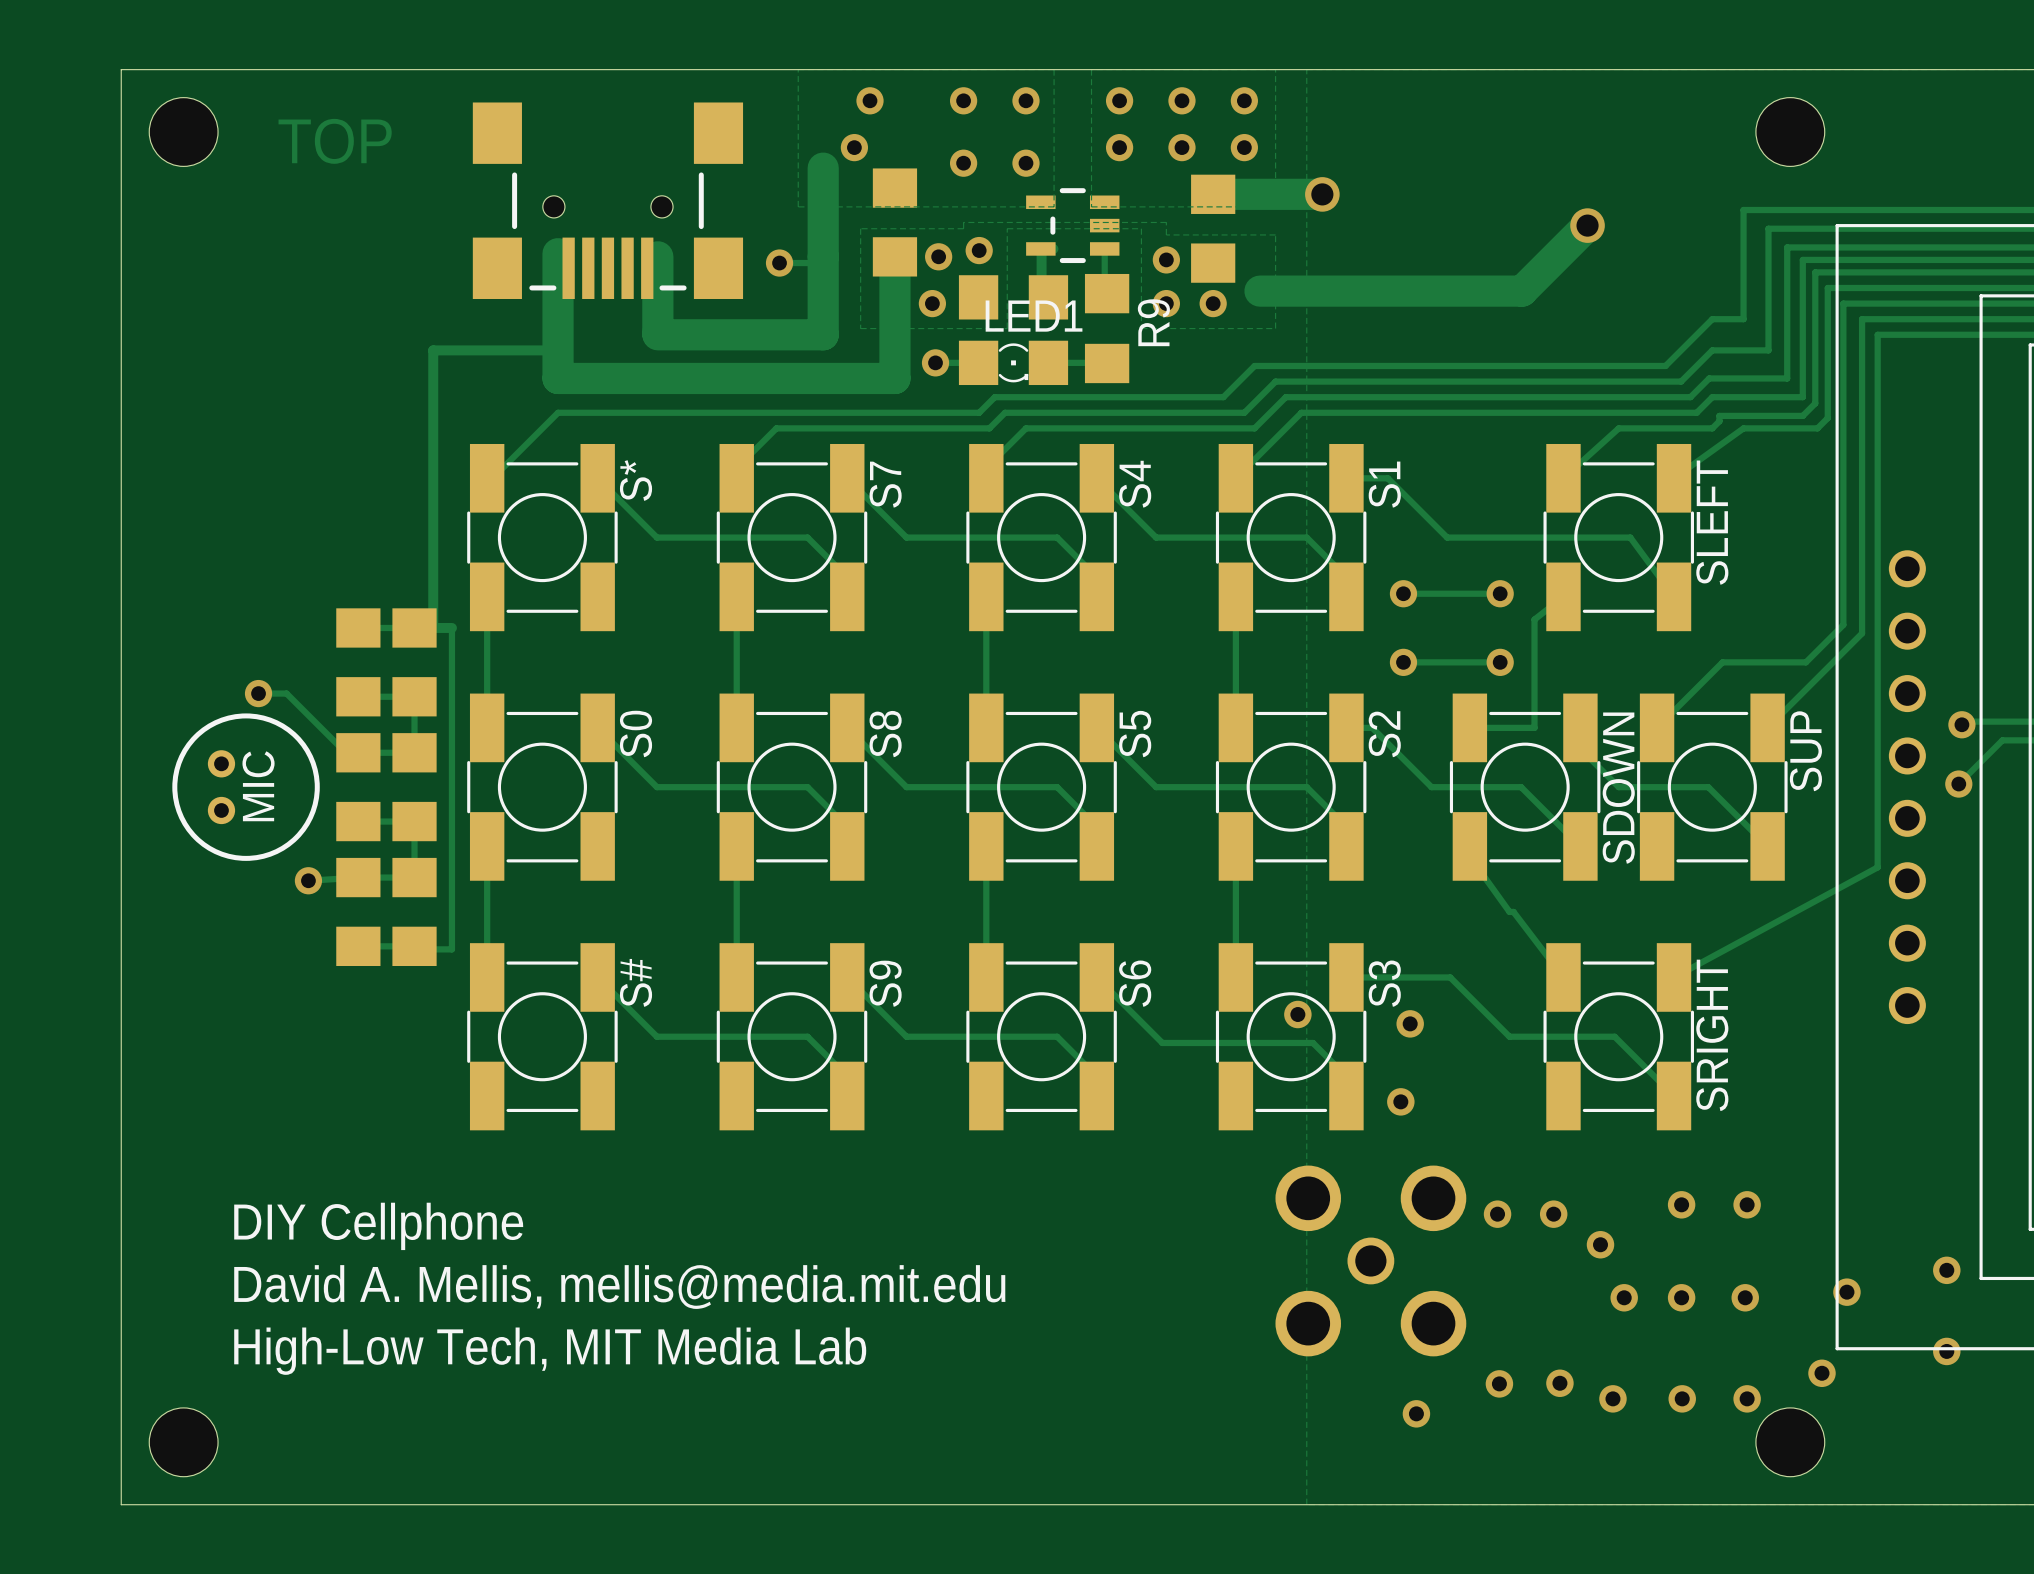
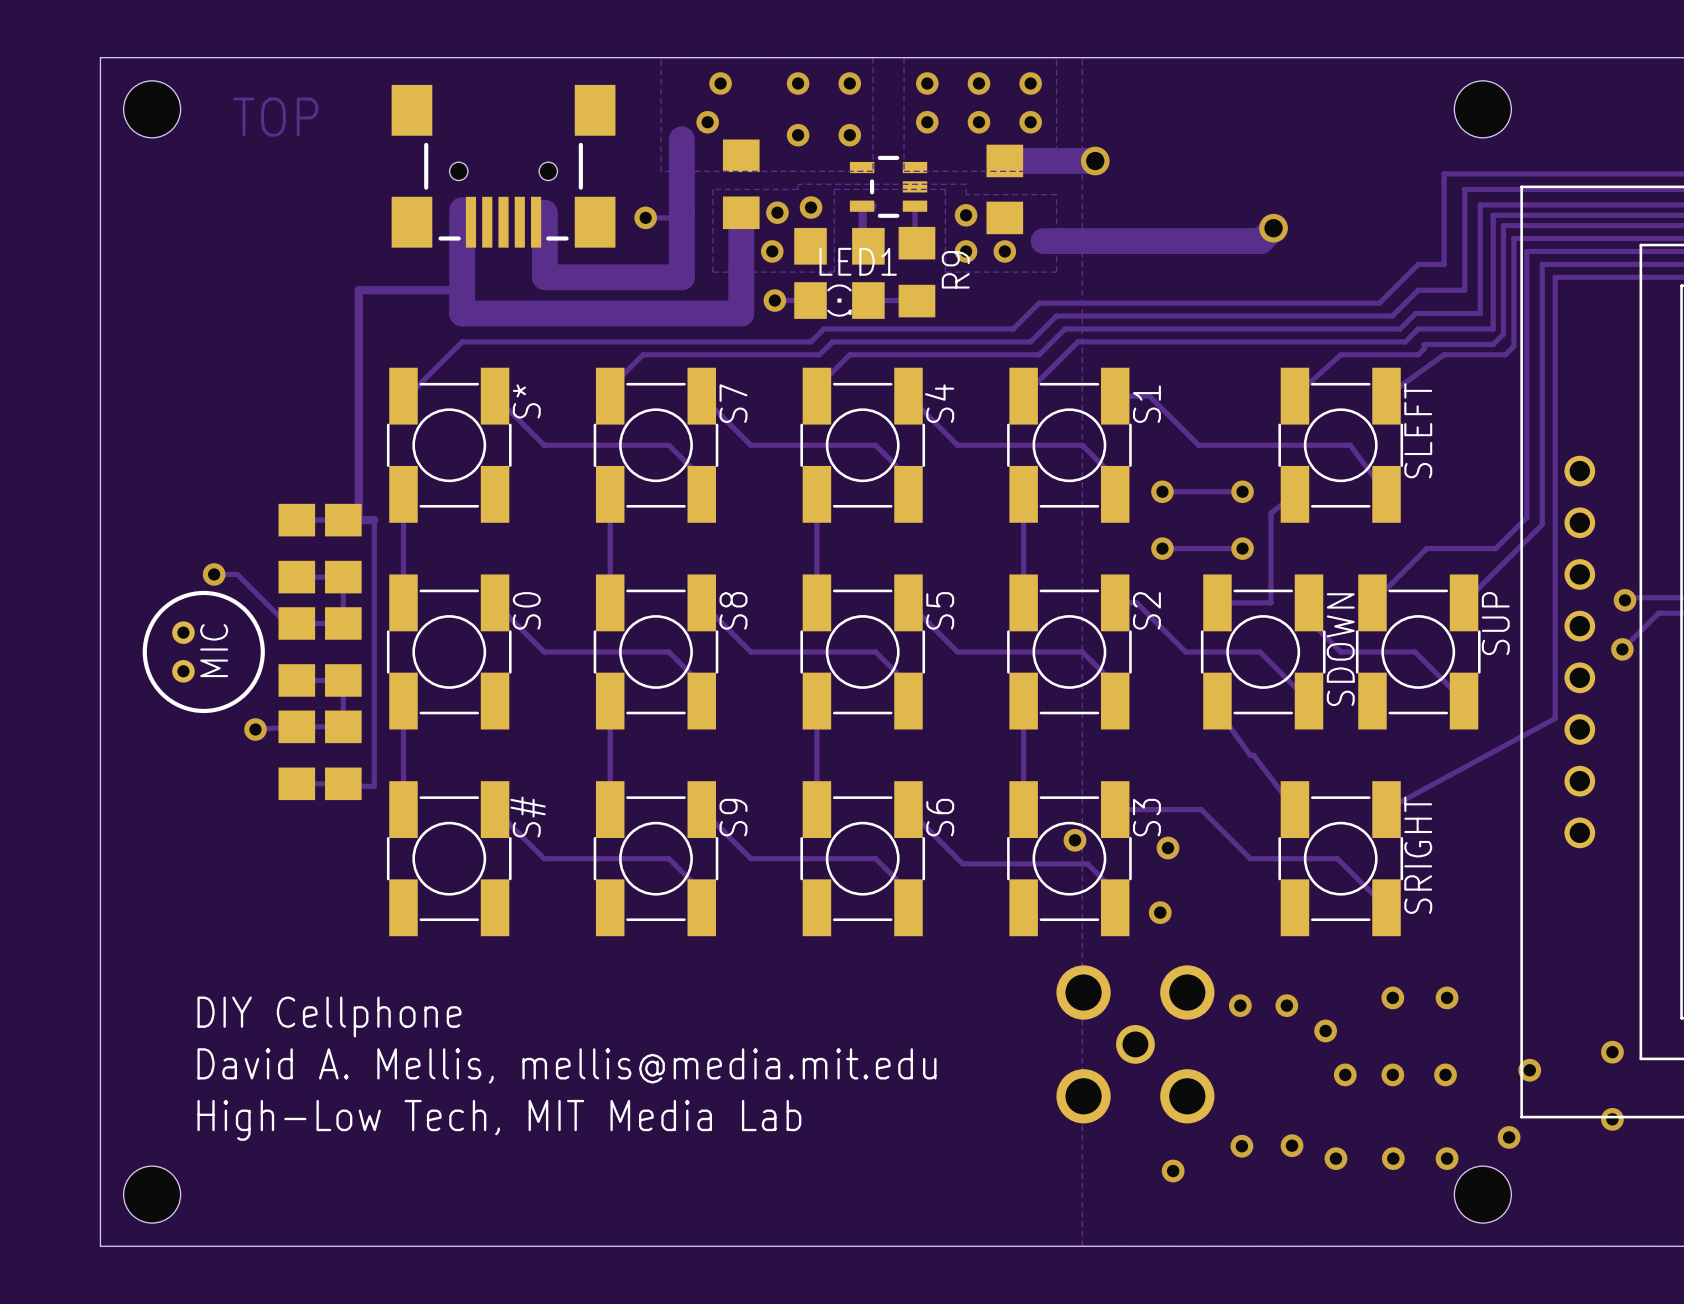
track: (1587, 225) (1537, 275) -> none
via position: (1587, 225) -> (1273, 228)

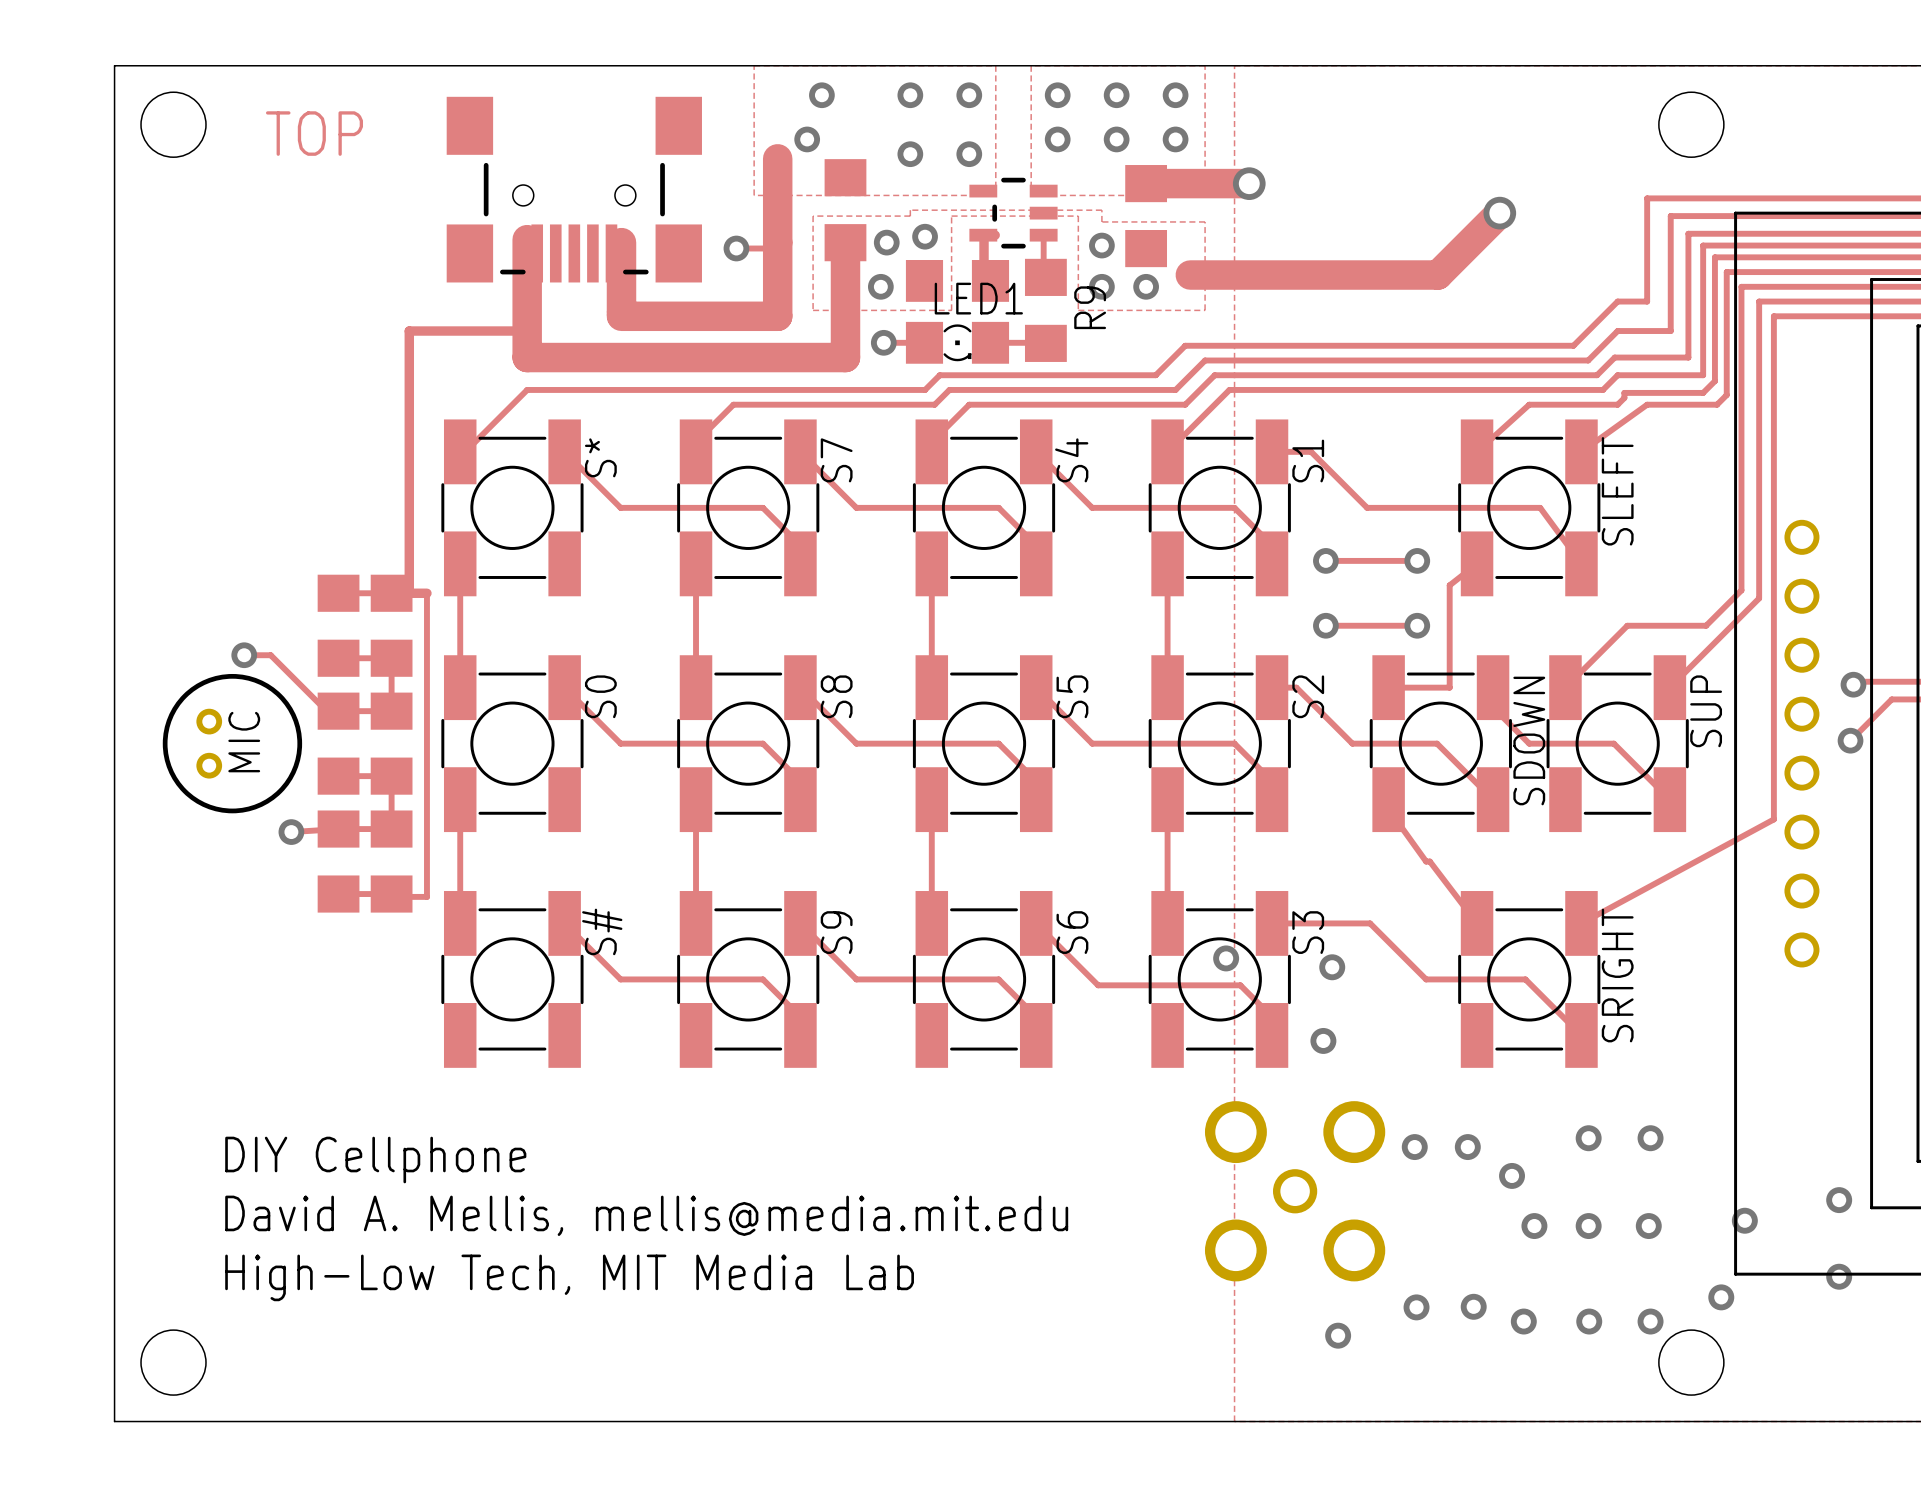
track: none -> (1499, 213) (1452, 260)
via position: (1273, 228) -> (1499, 213)

